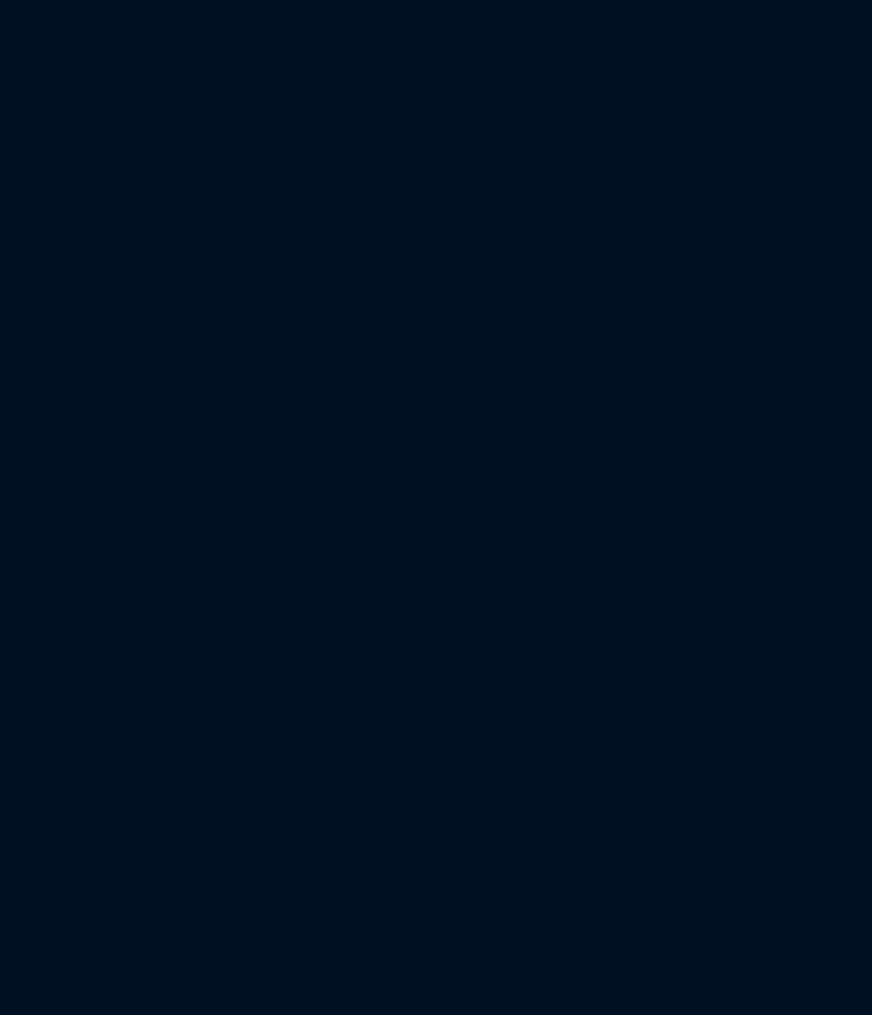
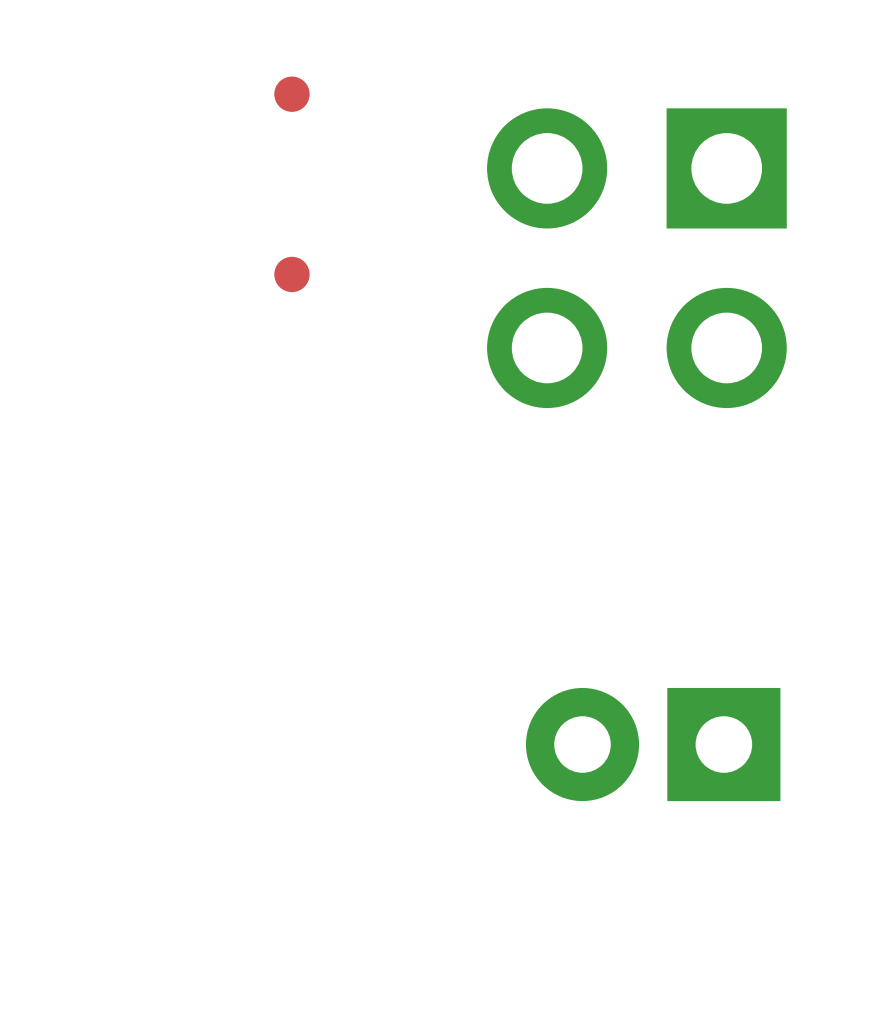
part: none -> (291, 94)
part: none -> (636, 258)
part: none -> (291, 274)
part: none -> (653, 744)

